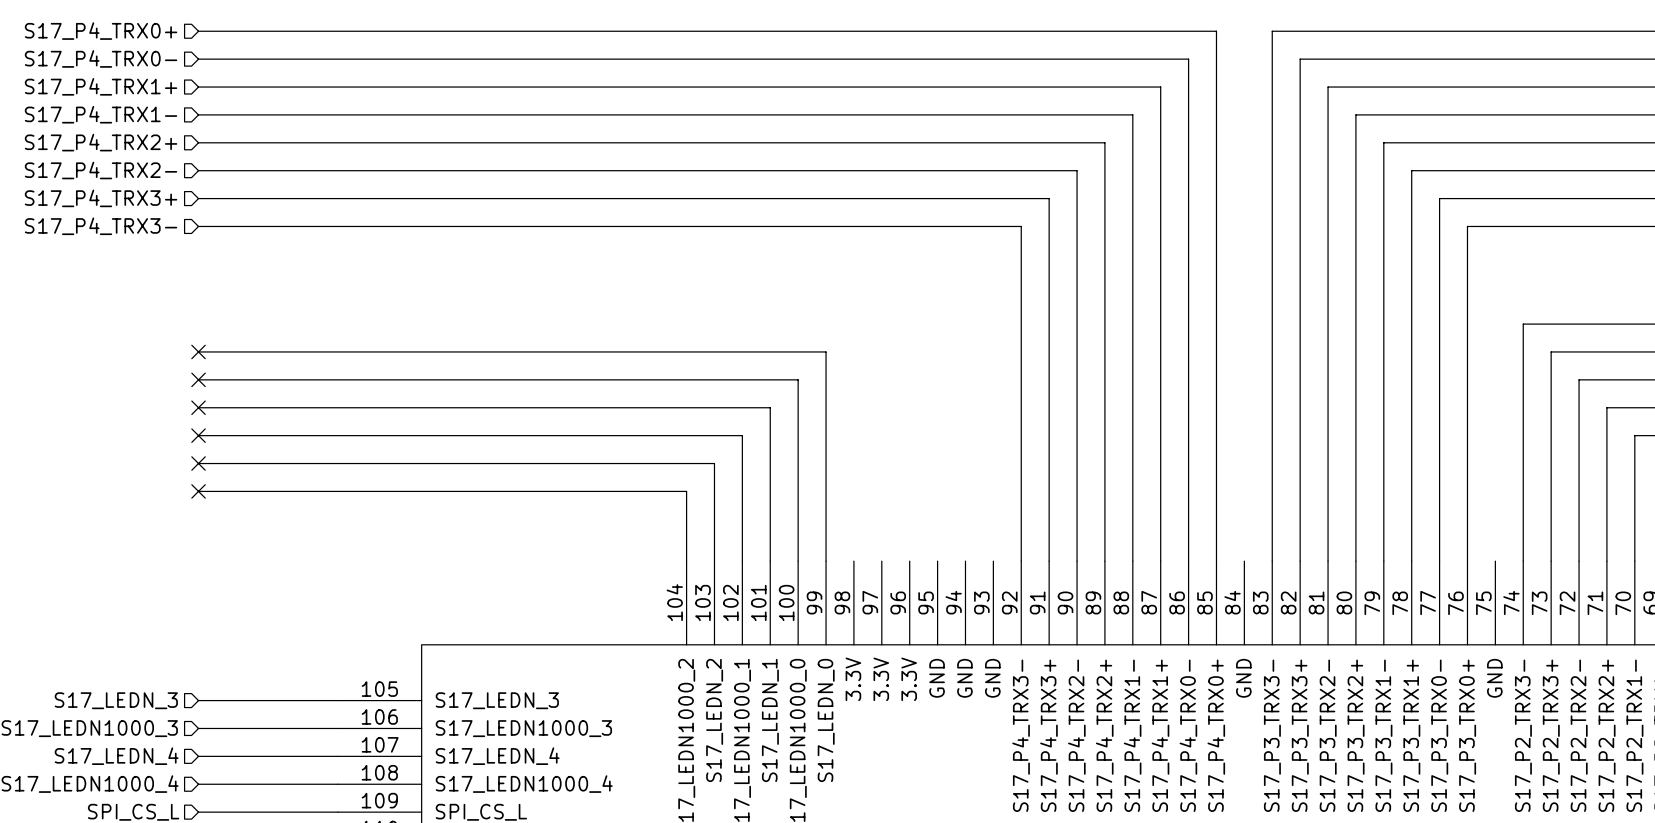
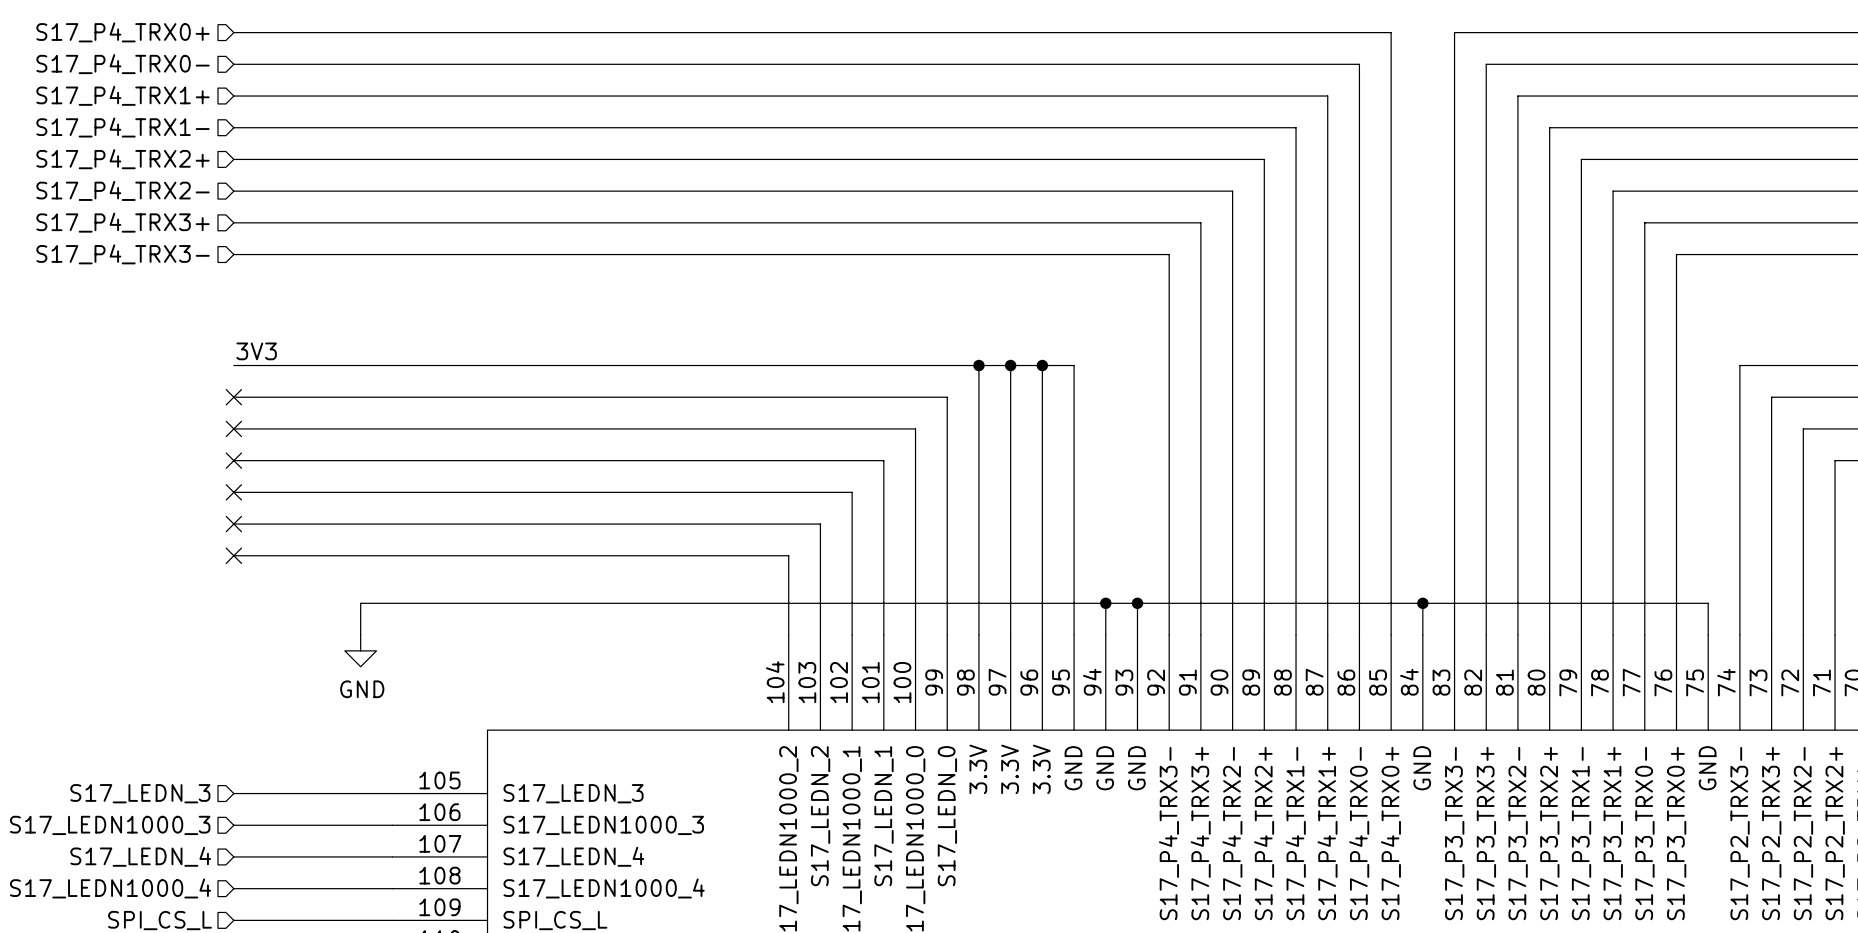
label: none -> 3V3 (256, 351)
wire: none -> (233, 365) (1074, 365) (1074, 635)
wire: none -> (978, 365) (978, 635)
junction: none -> (978, 365)
wire: none -> (1010, 365) (1010, 635)
junction: none -> (1010, 365)
wire: none -> (1042, 365) (1042, 635)
junction: none -> (1042, 365)
wire: none -> (1105, 603) (1105, 635)
junction: none -> (1105, 603)
wire: none -> (1137, 603) (1137, 635)
junction: none -> (1137, 603)
wire: none -> (1422, 603) (1422, 635)
junction: none -> (1422, 603)
wire: none -> (360, 635) (360, 603) (1708, 603) (1708, 635)
power symbol: none -> GND (360, 650)

